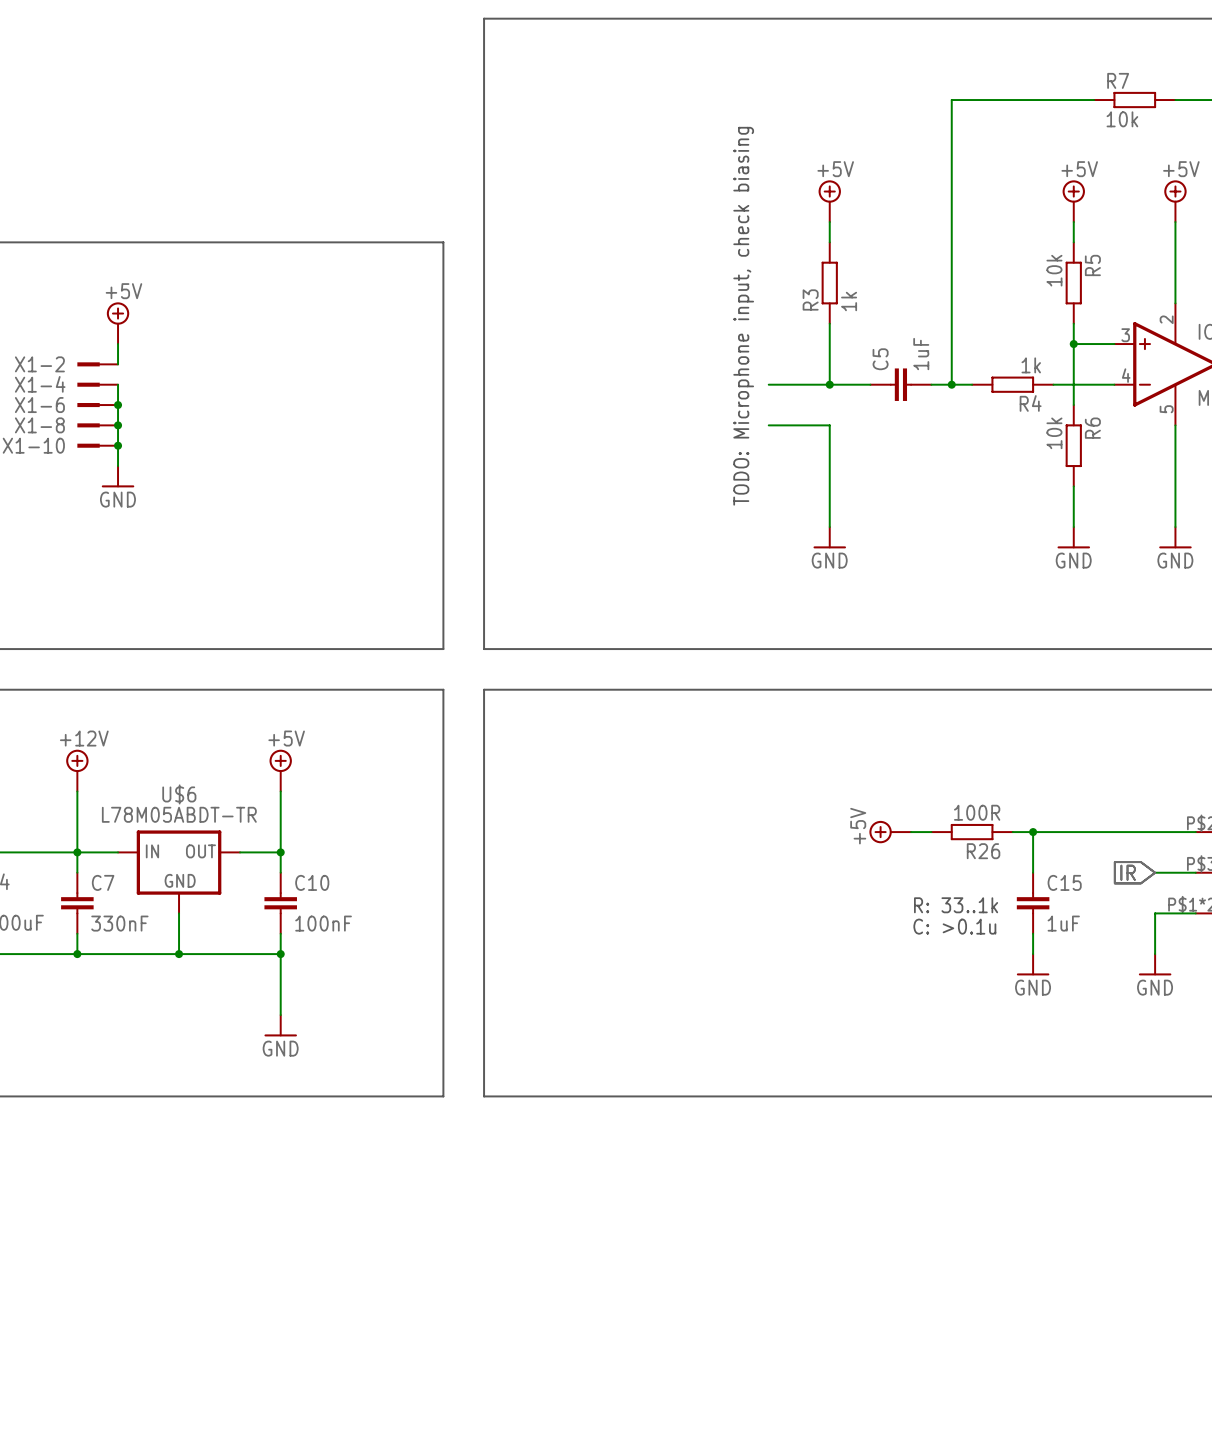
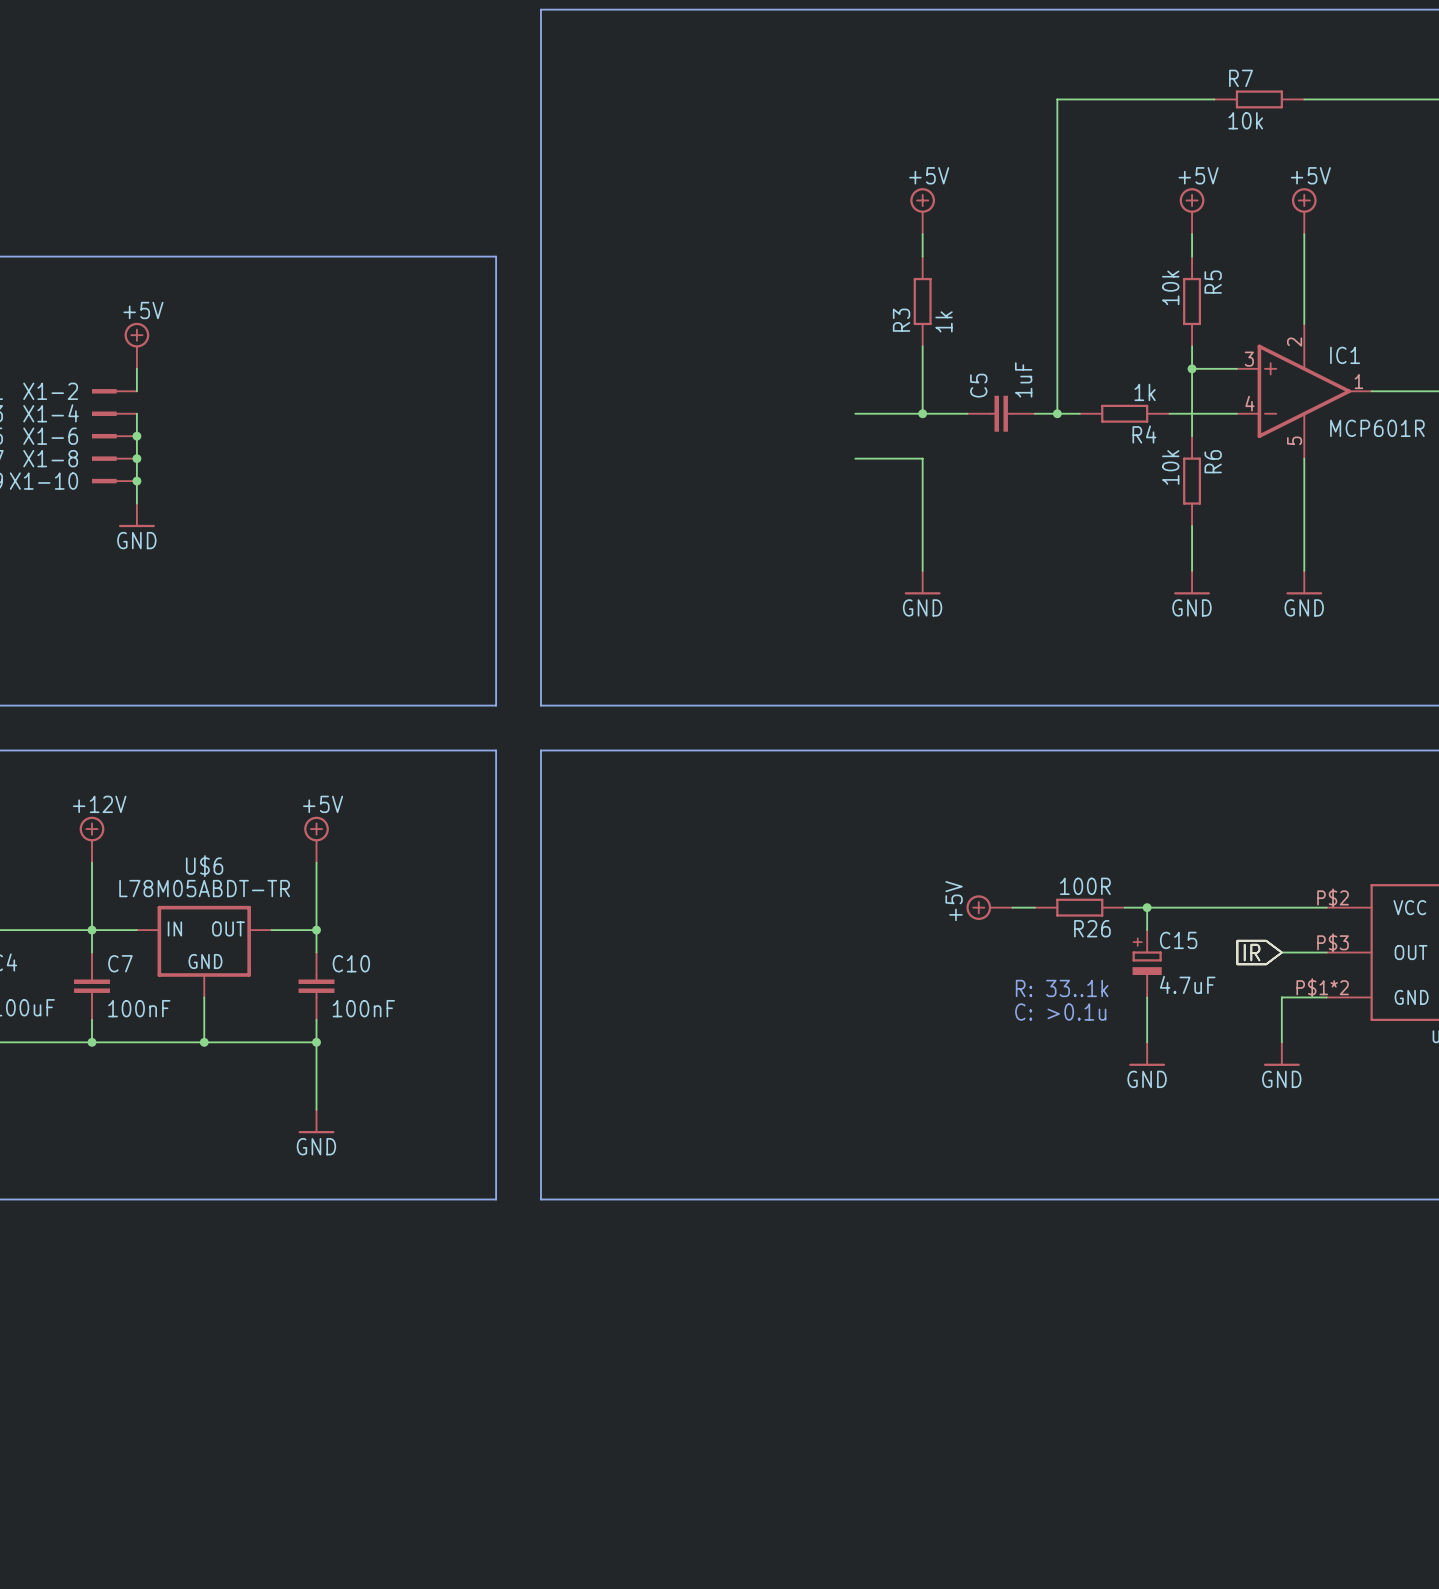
text: TODO: Microphone input, check biasing (743, 316) -> none
C15 symbol: [1016, 872, 1050, 934] -> [1132, 930, 1162, 998]
C7 value: 330nF (119, 923) -> 100nF (139, 1008)
C15 value: 1uF (1063, 923) -> 4.7uF (1187, 984)

